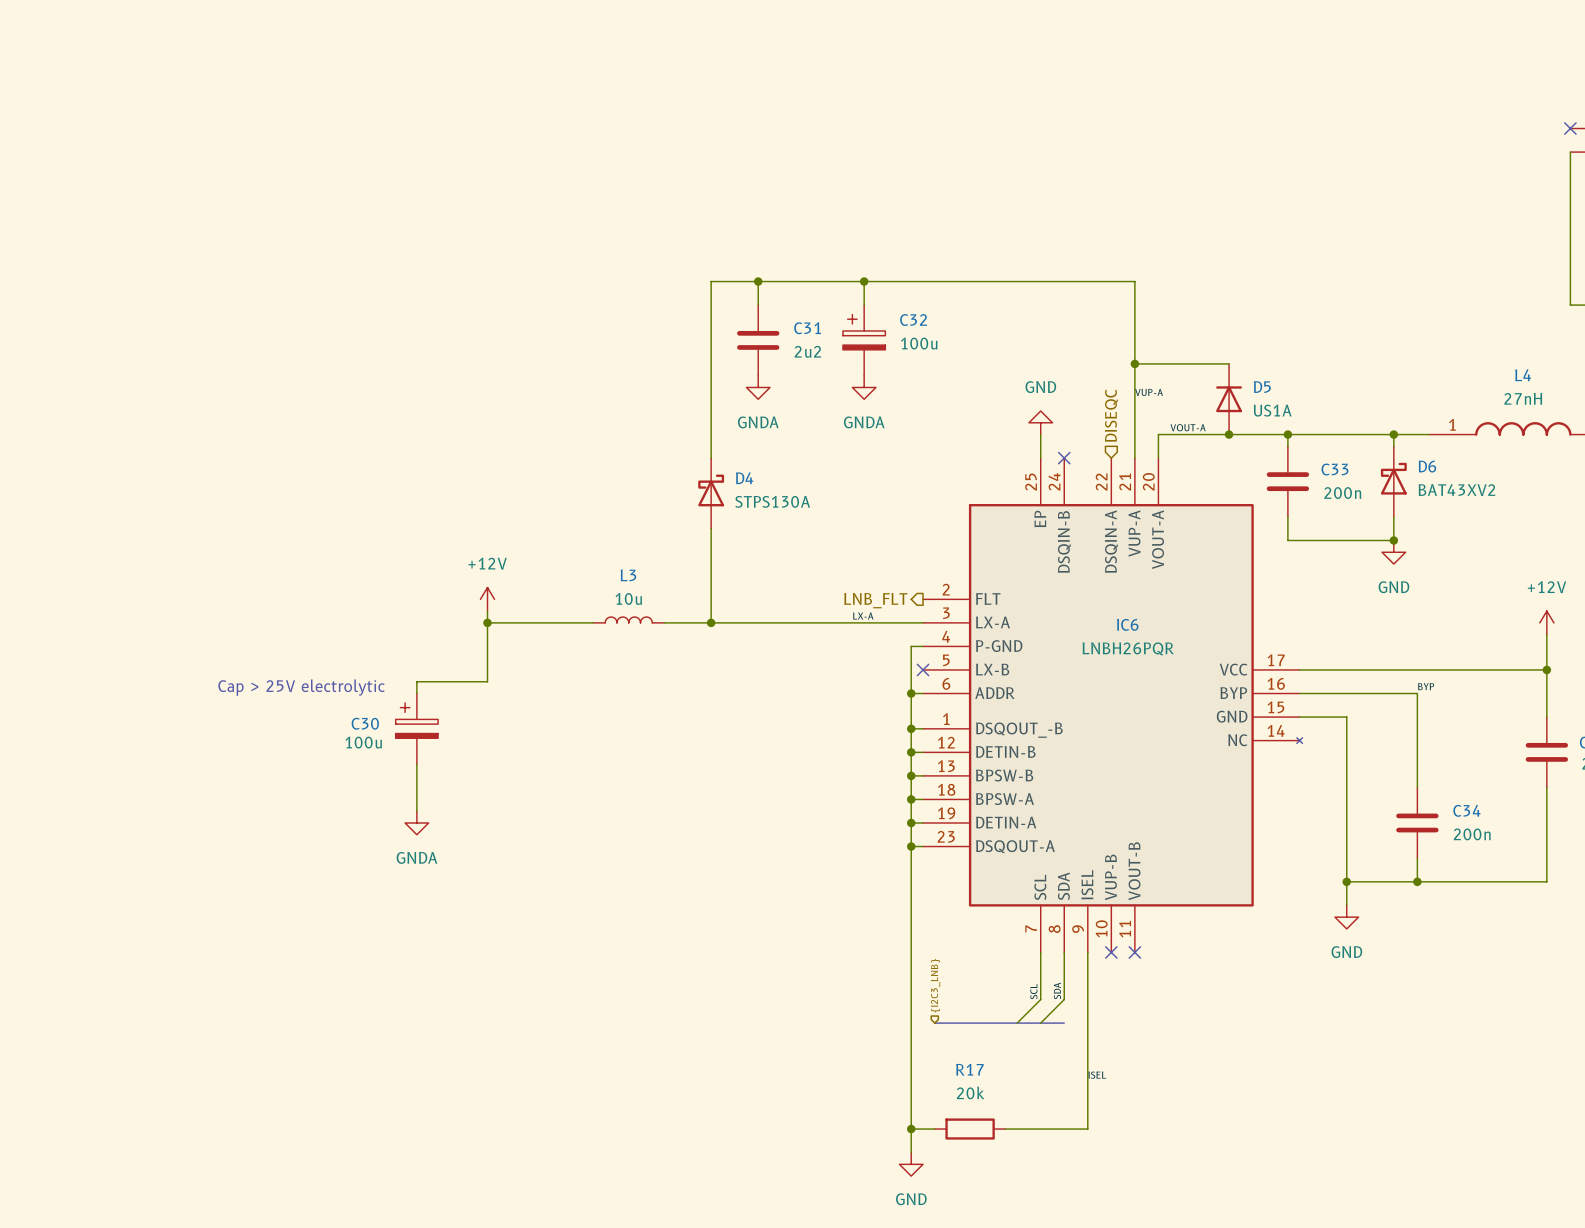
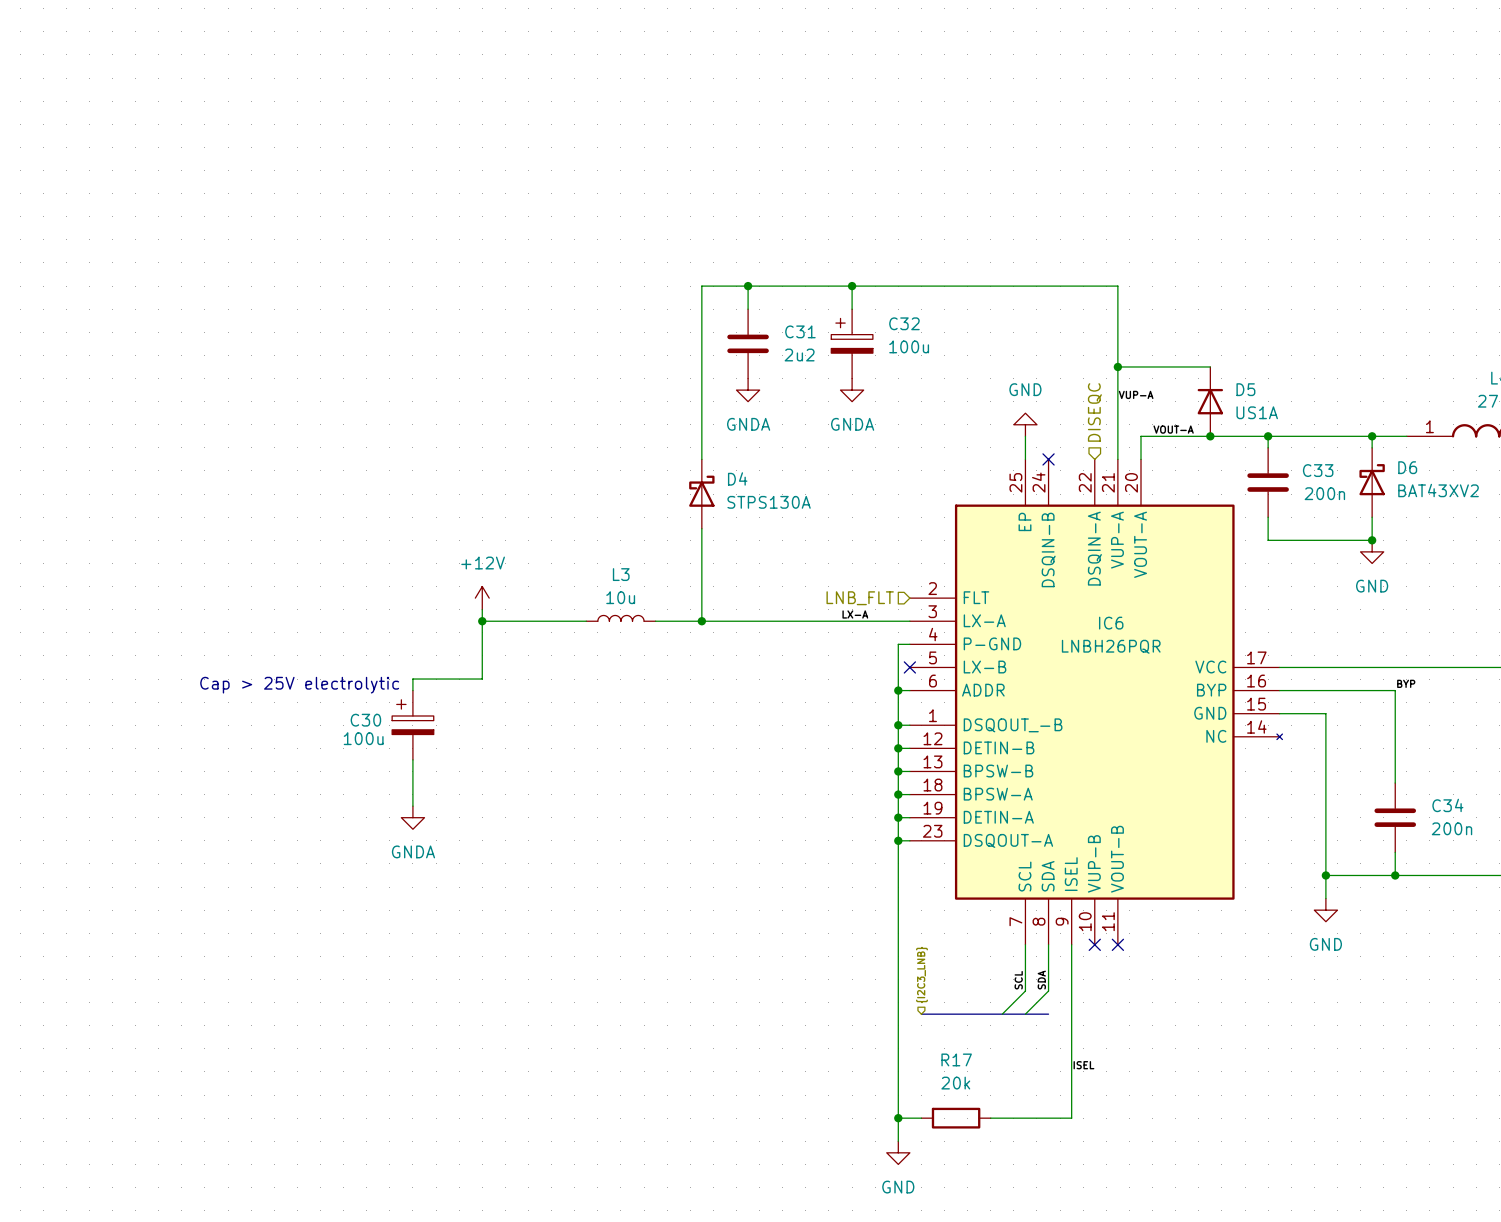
hierarchical label shape: output (875, 600) -> input (860, 598)

